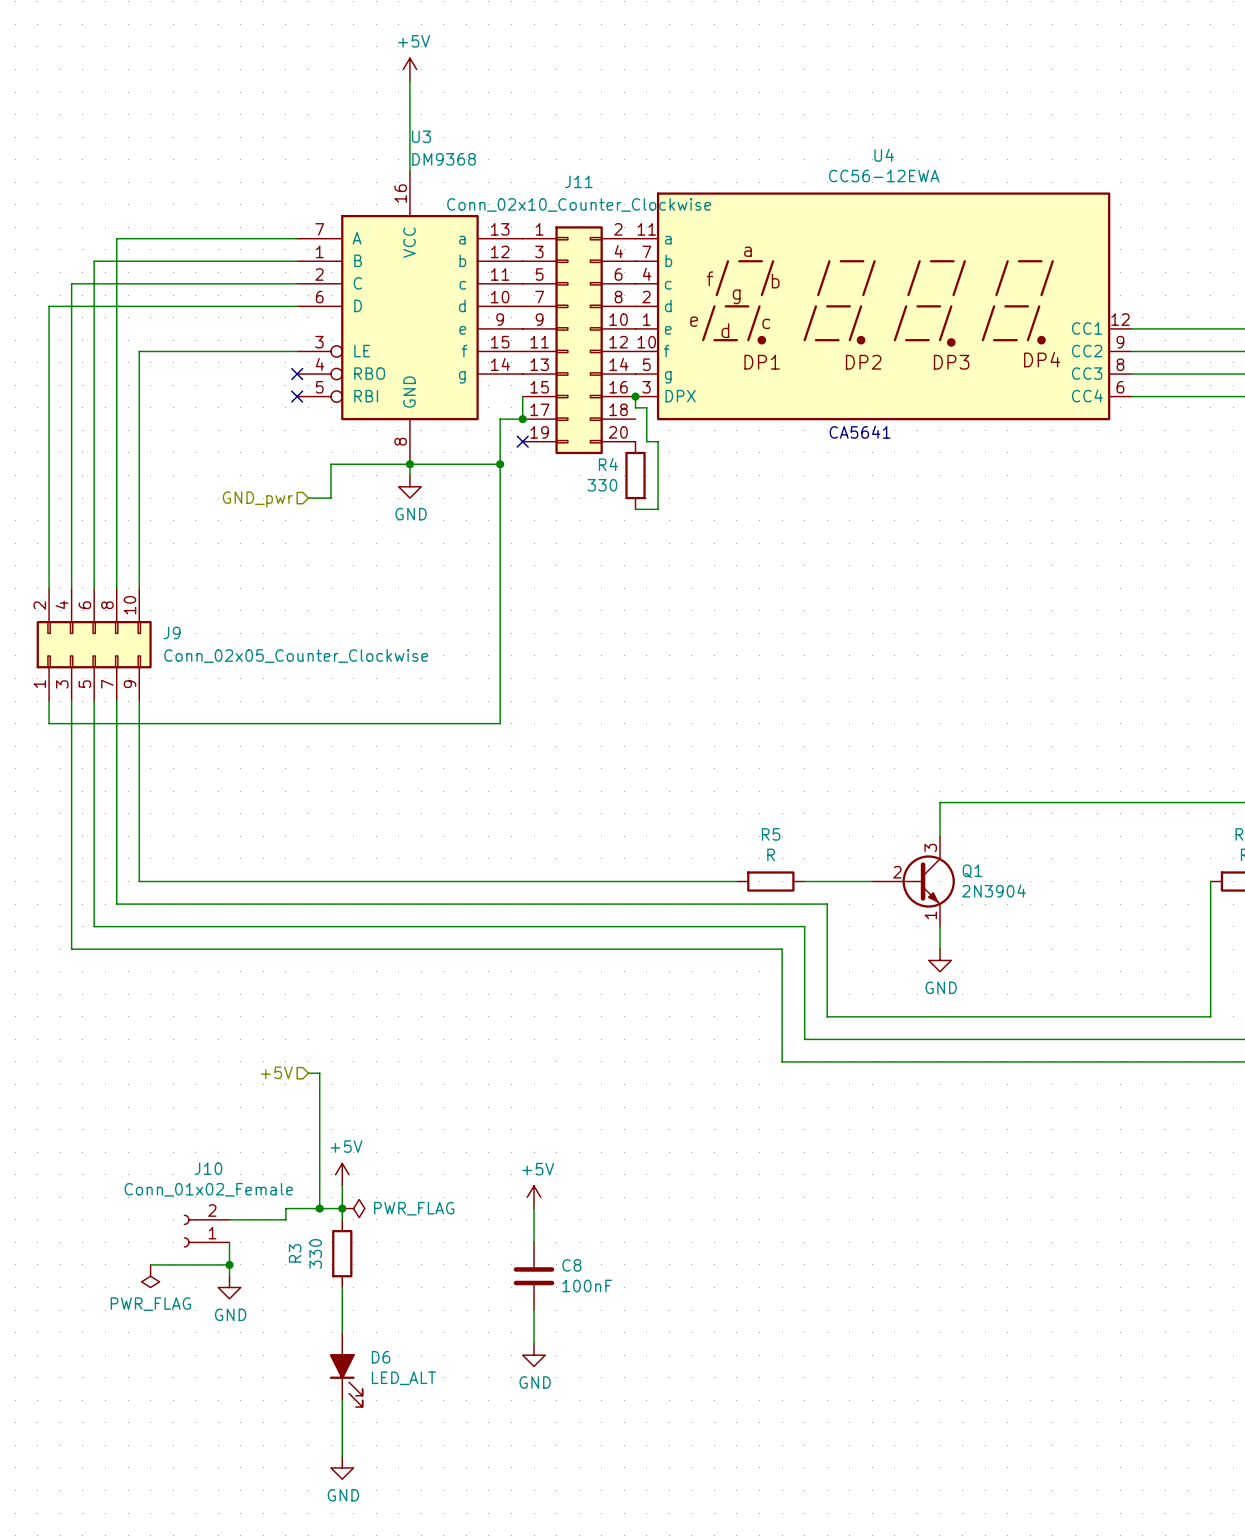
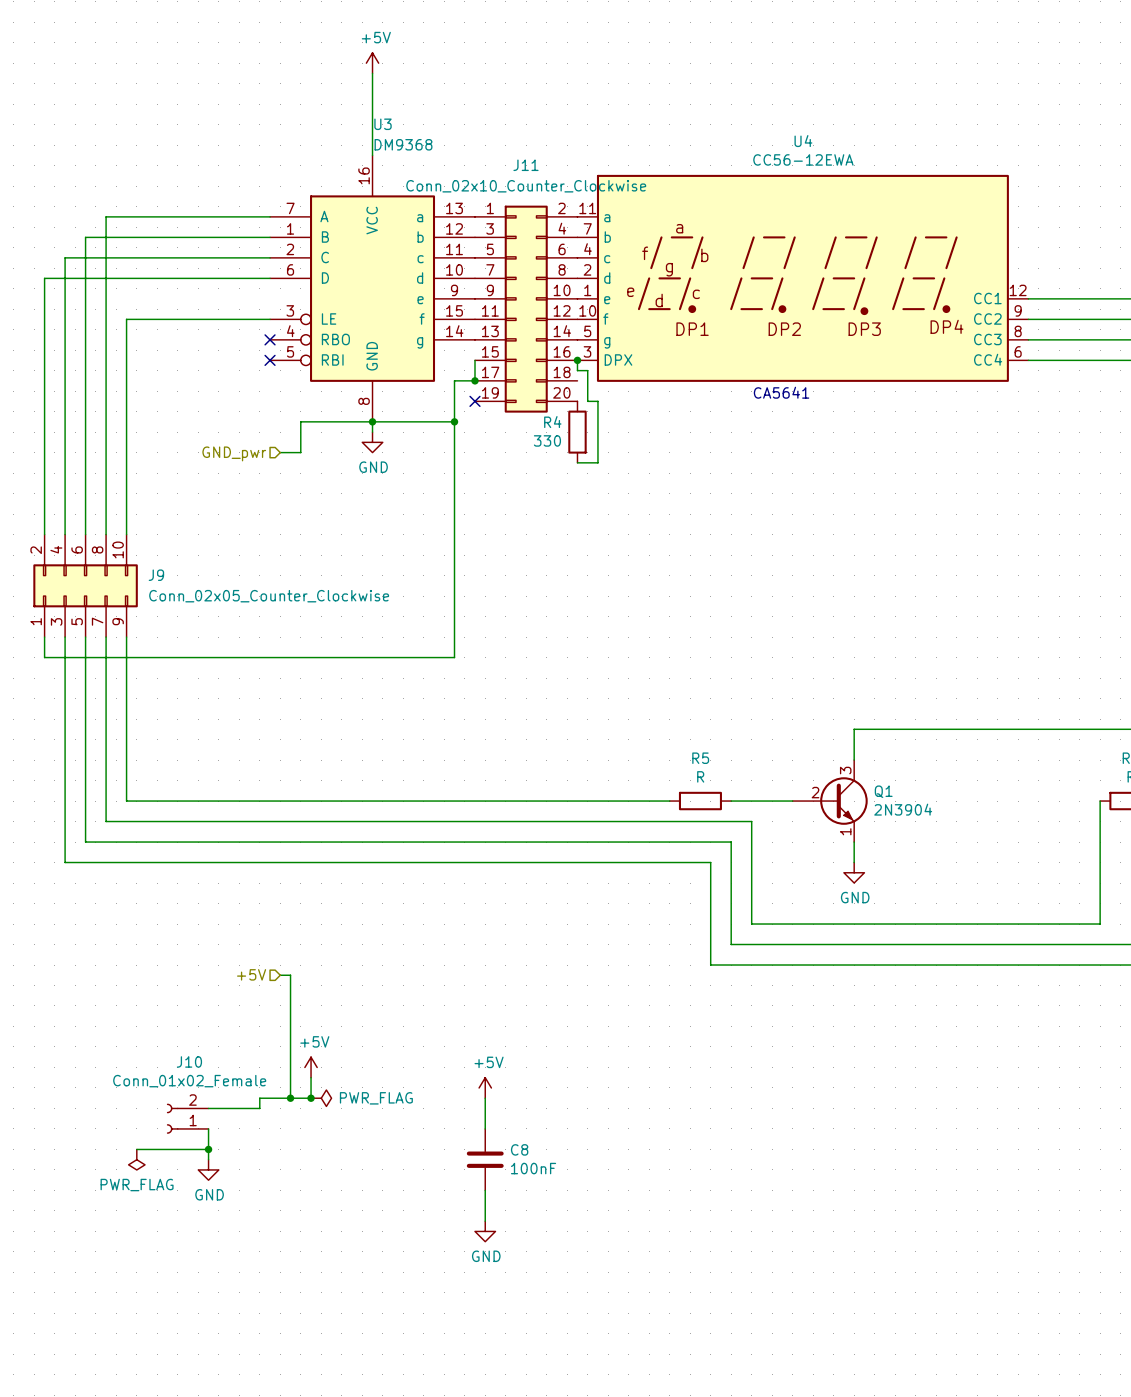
wire: (342, 1208) (342, 1219) -> none
R3: 330 (342, 1253) -> none
wire: (342, 1287) (342, 1332) -> none
D6: LED_ALT (346, 1369) -> none
wire: (342, 1400) (342, 1456) -> none
power symbol: GND (342, 1467) -> none

